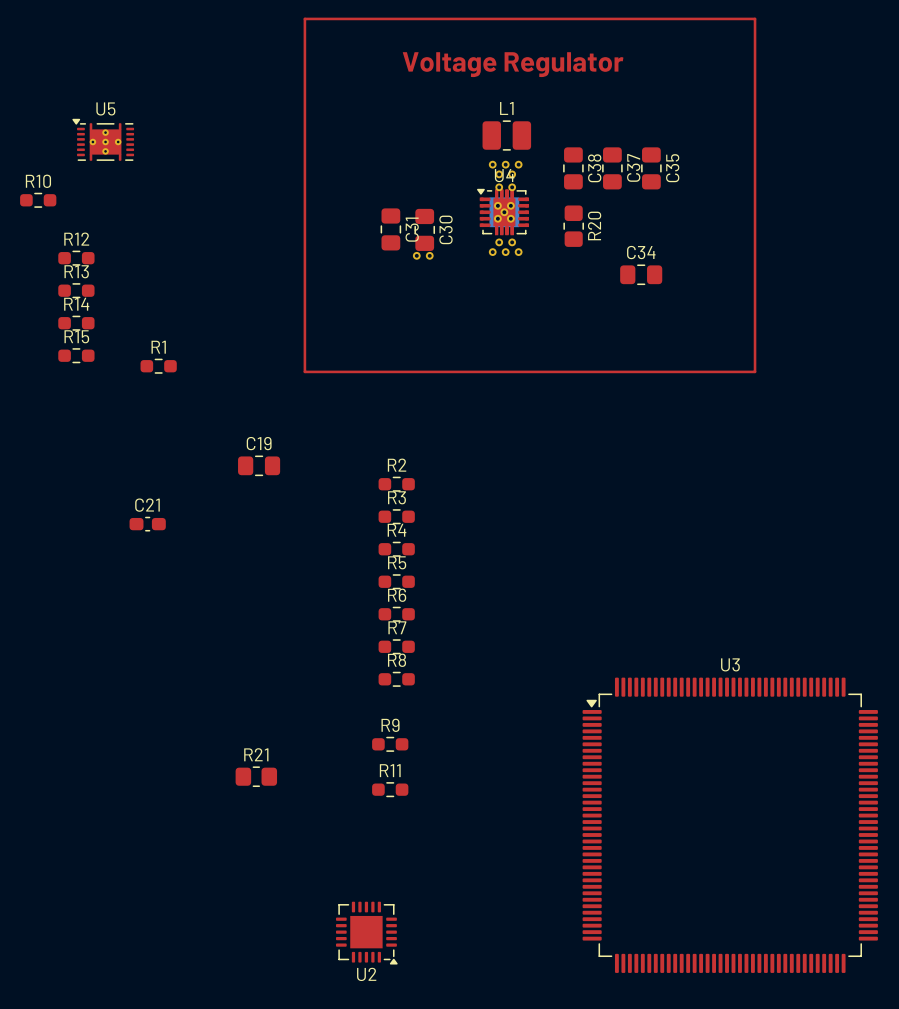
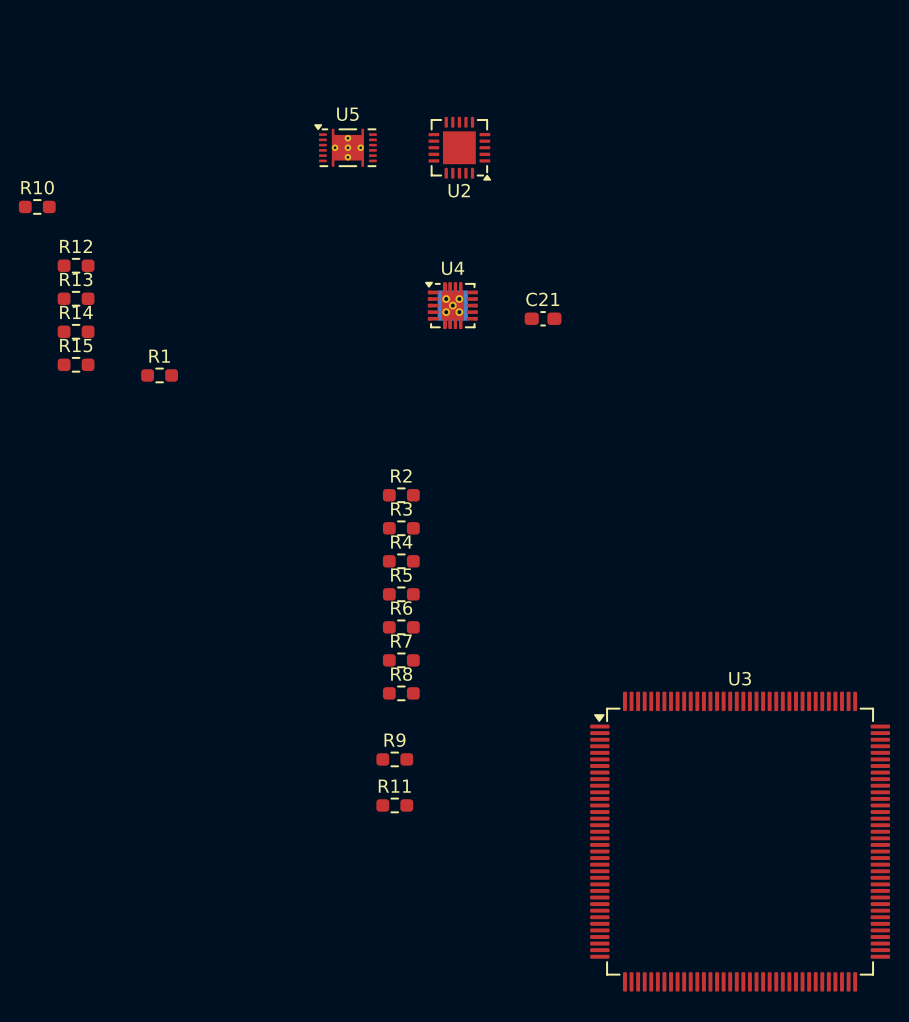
top track: (304, 18) (755, 18) (755, 371) (304, 371) (304, 18) -> none
text: Voltage Regulator (513, 64) -> none
L1: (506, 135) -> none
U5 position: (103, 139) -> (345, 145)
part: (492, 164) -> none
part: (505, 164) -> none
part: (518, 164) -> none
C38: (573, 168) -> none
C37: (612, 168) -> none
C35: (651, 168) -> none
part: (499, 174) -> none
part: (512, 174) -> none
part: (499, 187) -> none
part: (512, 187) -> none
U4 position: (503, 212) -> (451, 305)
R20: (573, 226) -> none
C31: (390, 229) -> none
C30: (424, 229) -> none
part: (499, 242) -> none
part: (512, 242) -> none
part: (492, 252) -> none
part: (505, 252) -> none
part: (518, 252) -> none
part: (416, 255) -> none
part: (429, 255) -> none
C34: (641, 274) -> none
C19: (259, 465) -> none
C21 position: (147, 524) -> (543, 318)
R21: (256, 776) -> none
U2 position: (366, 933) -> (459, 148)

